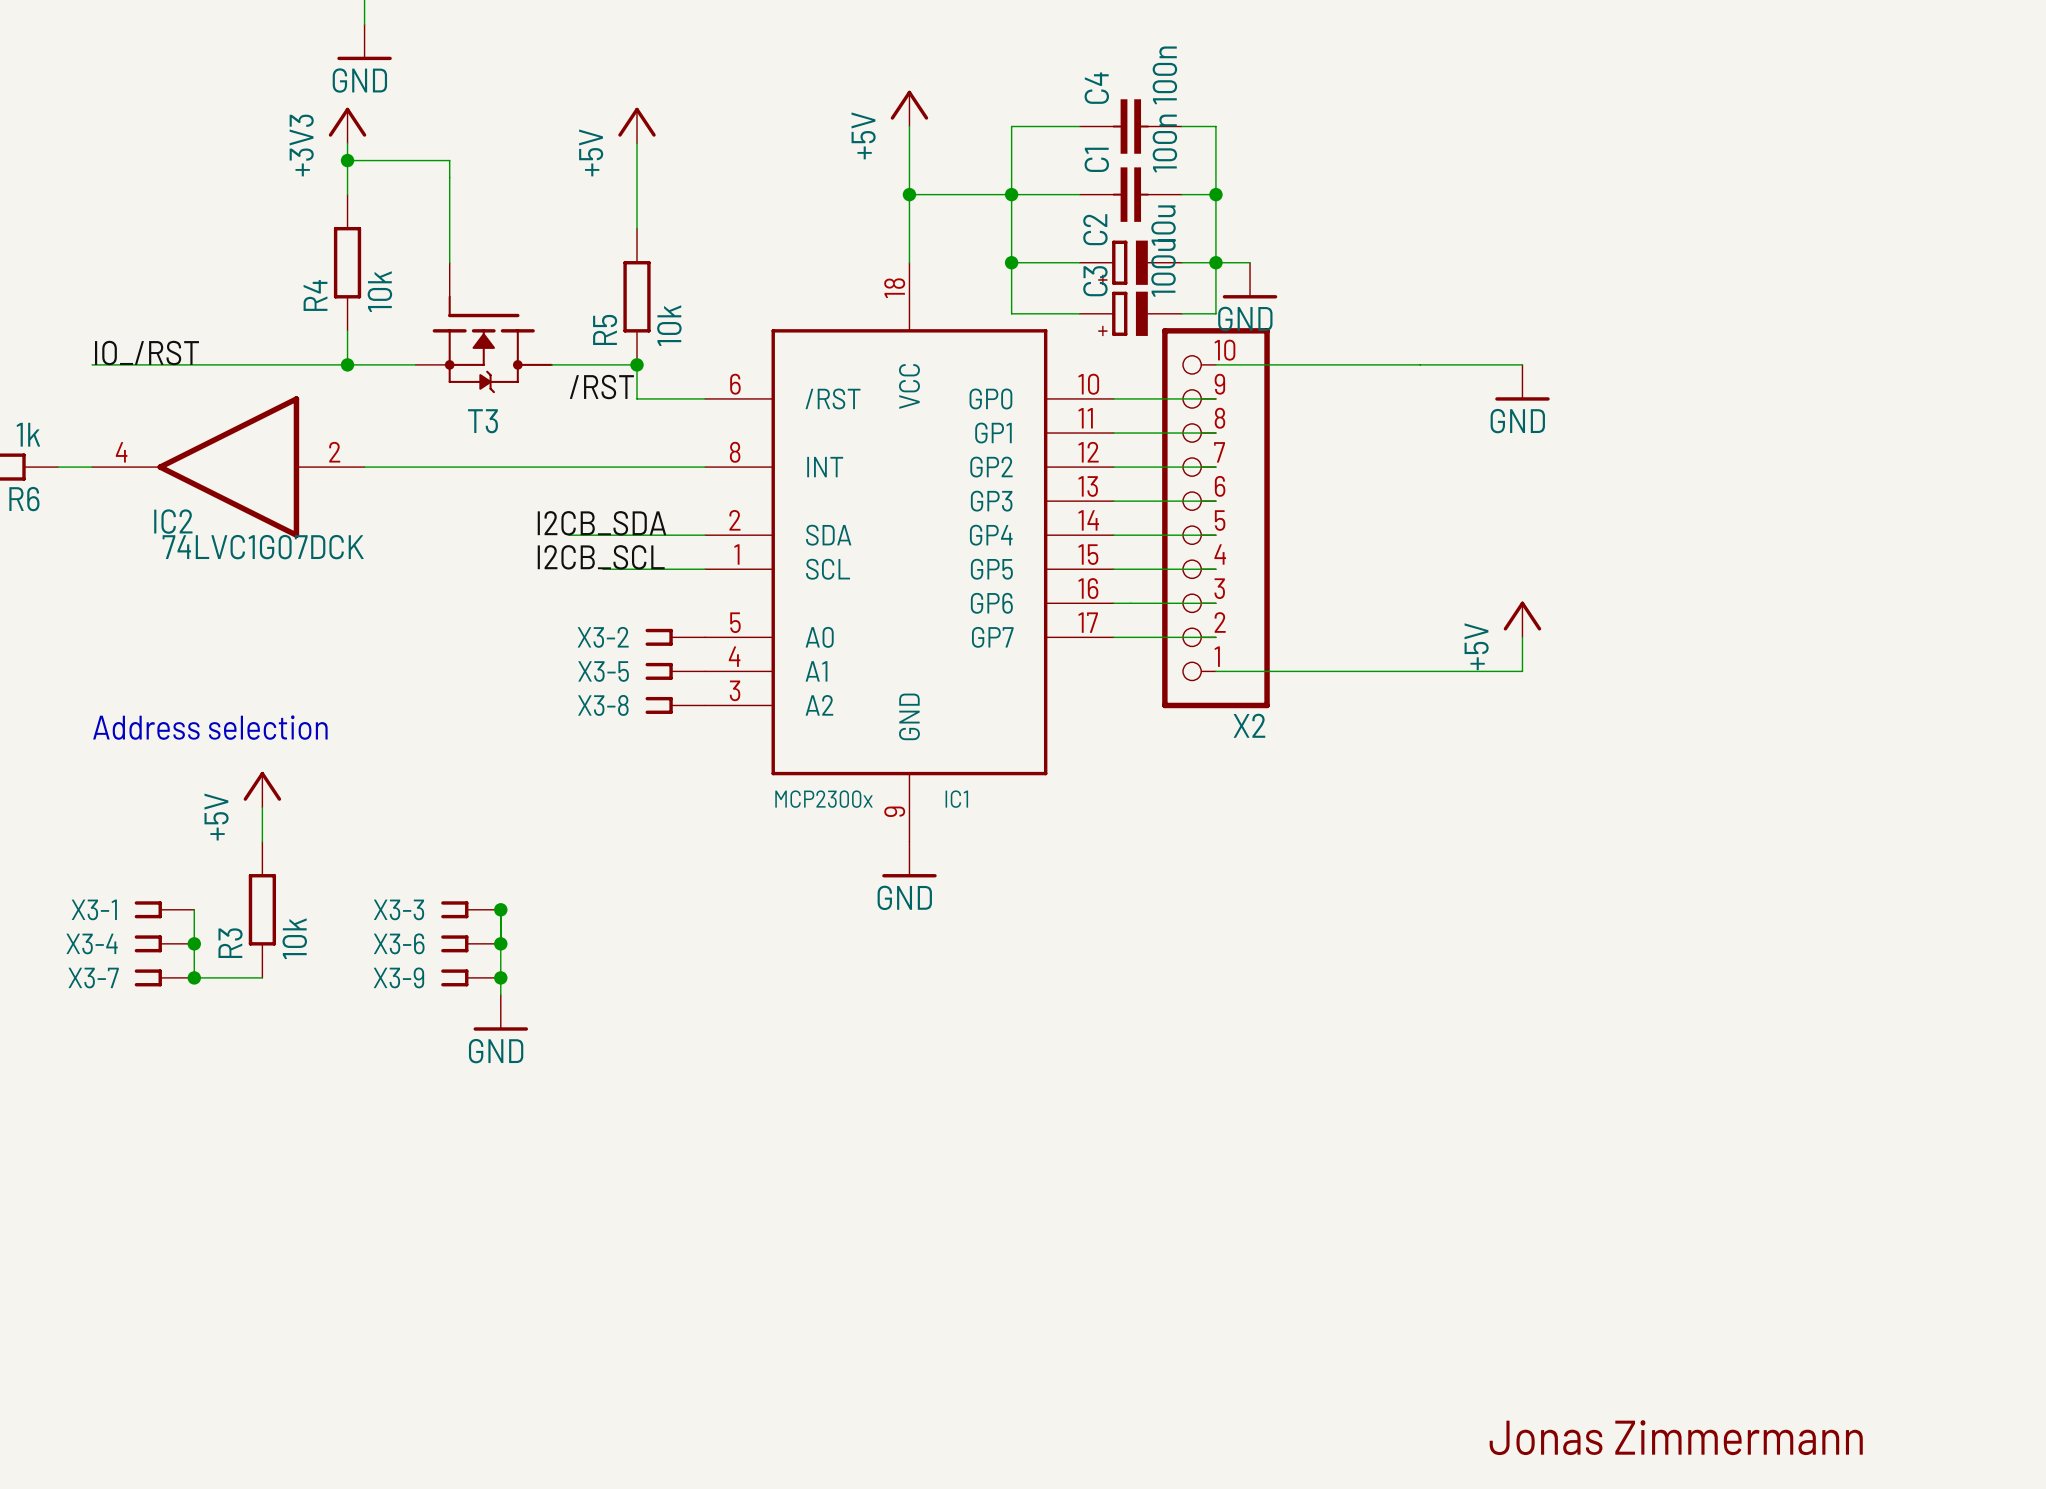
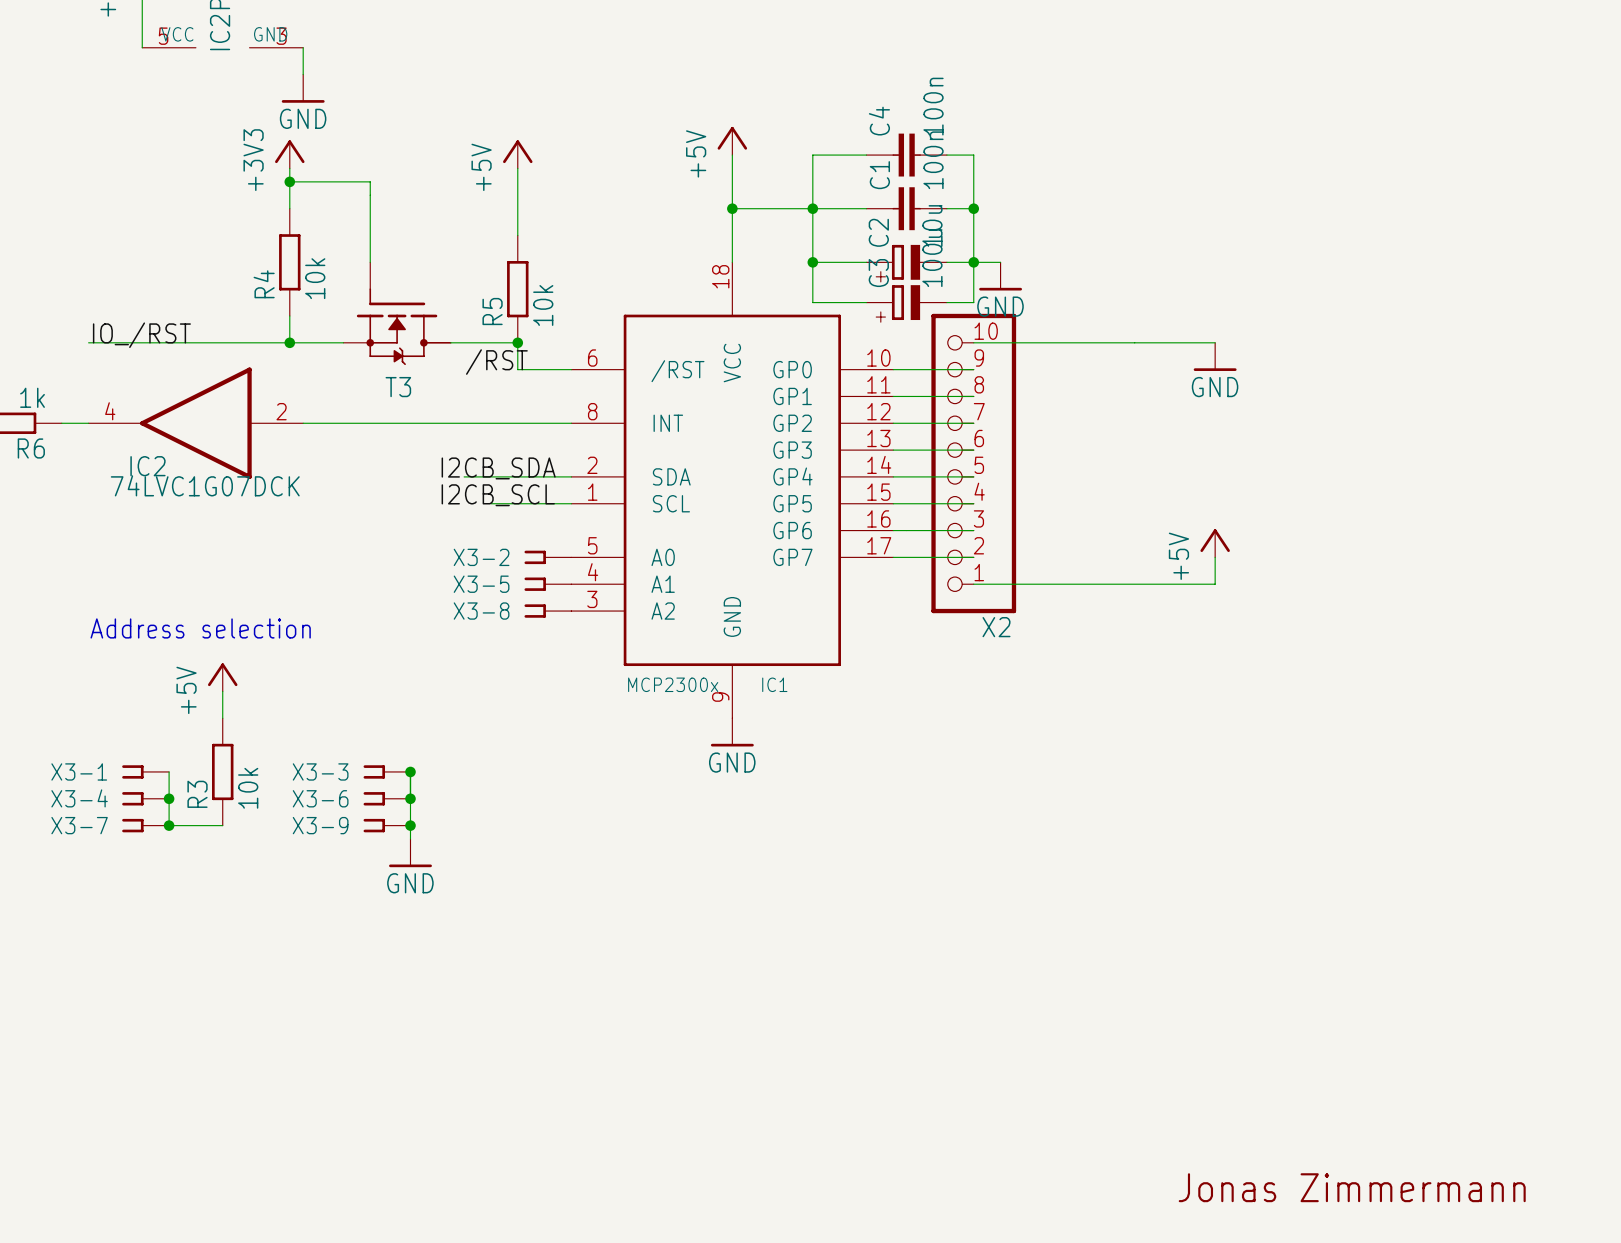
text position: Jonas Zimmermann (1676, 1437) -> Jonas Zimmermann (1352, 1187)

